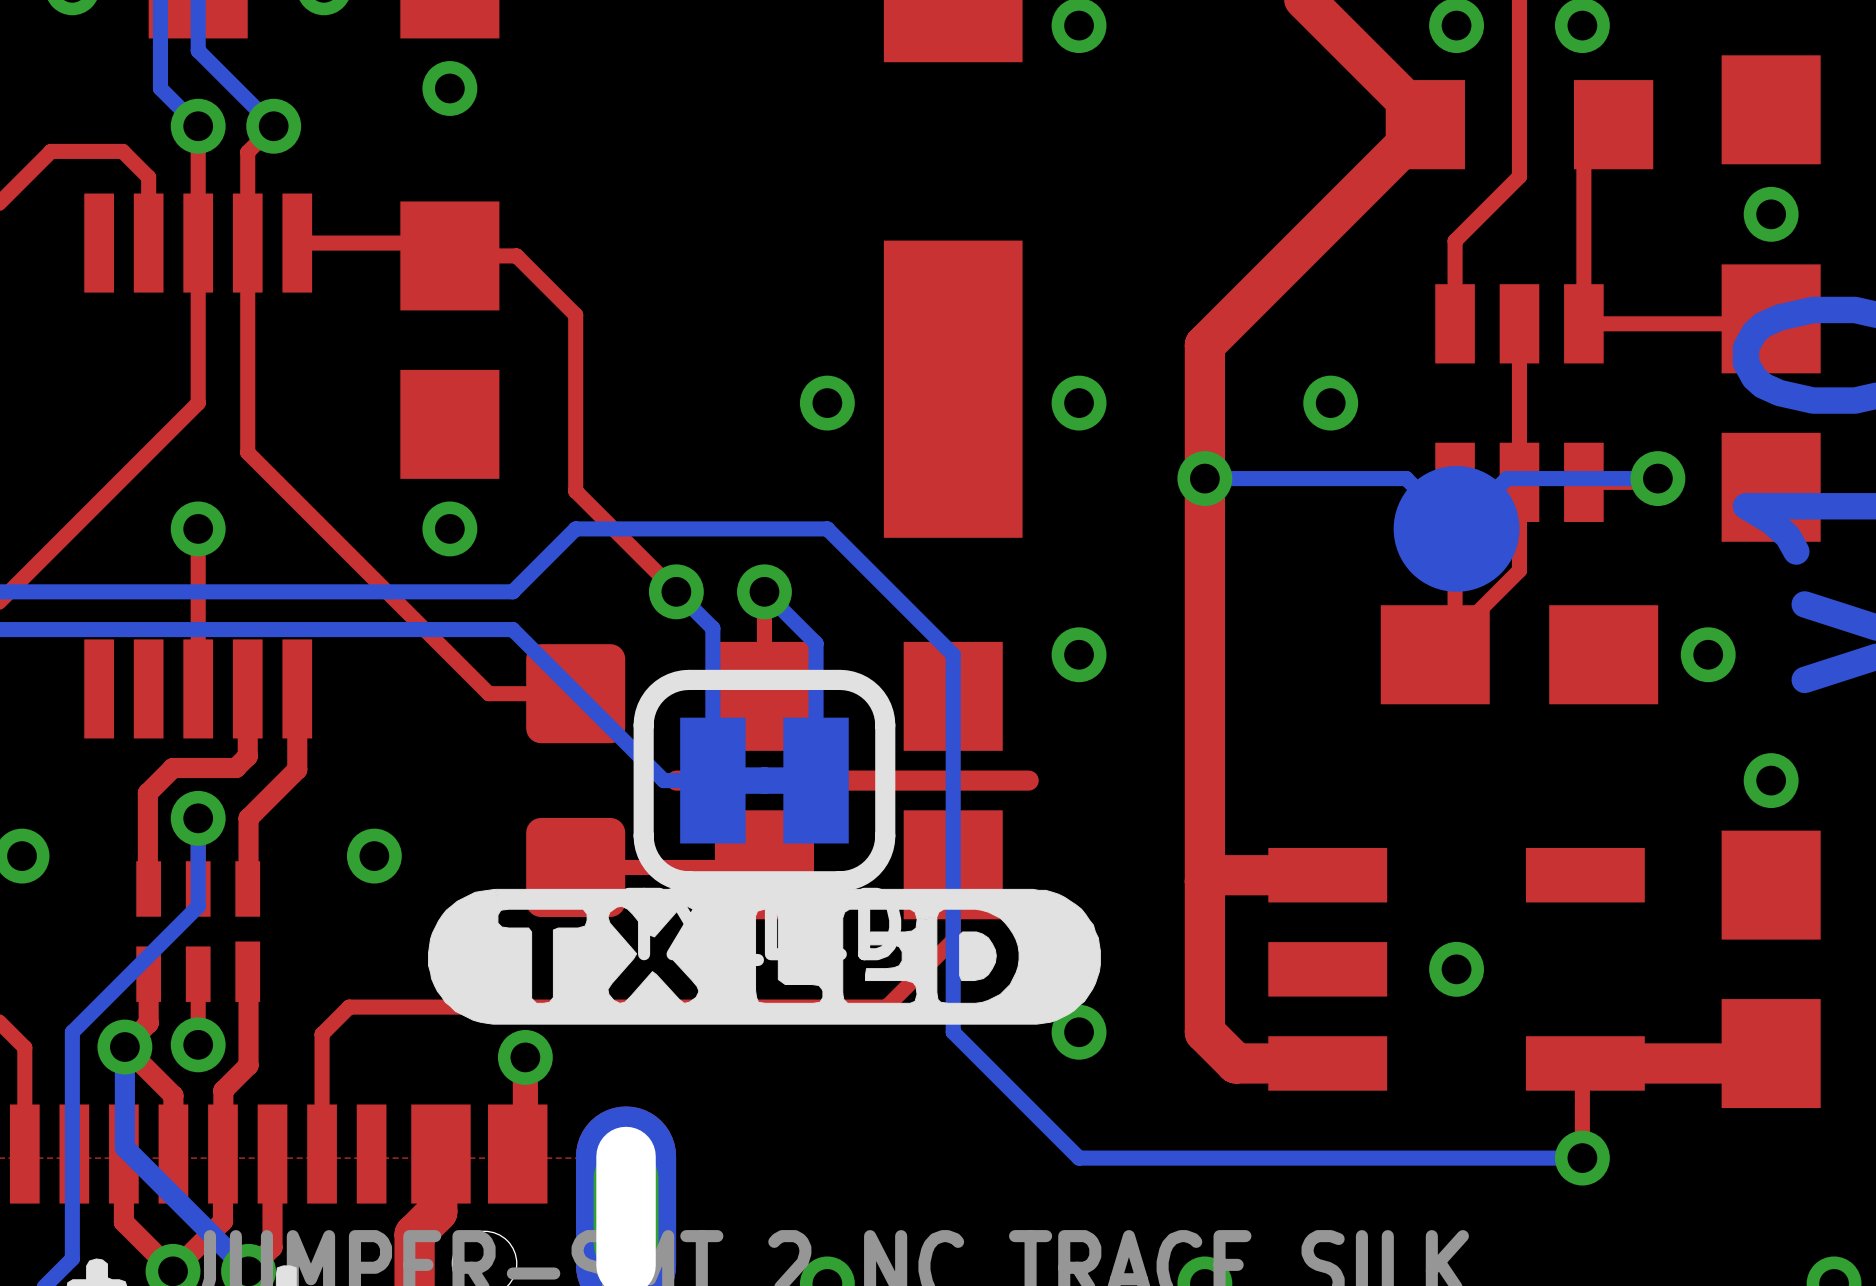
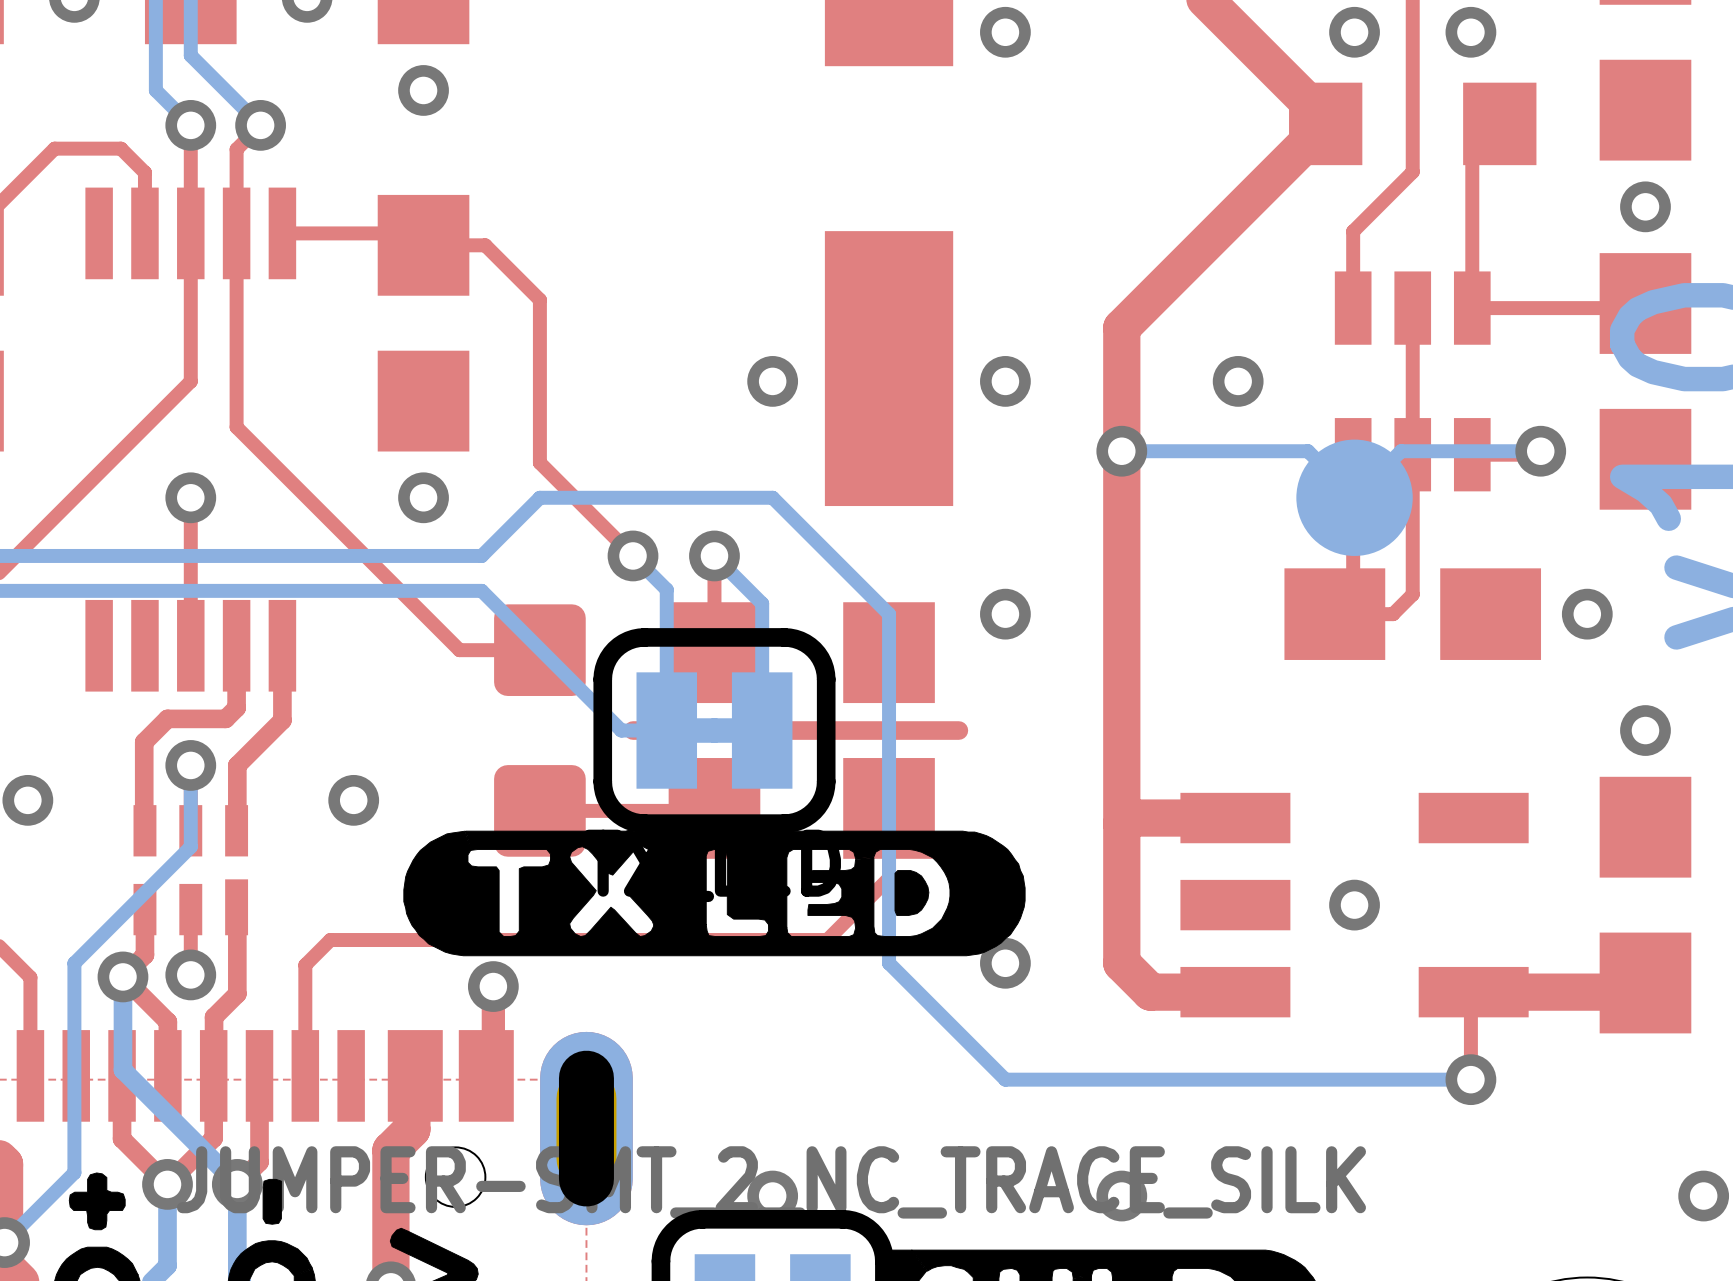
top track: (1519, 570) (1455, 634) -> (1412, 536) (1412, 594) (1393, 614) (1334, 614)

